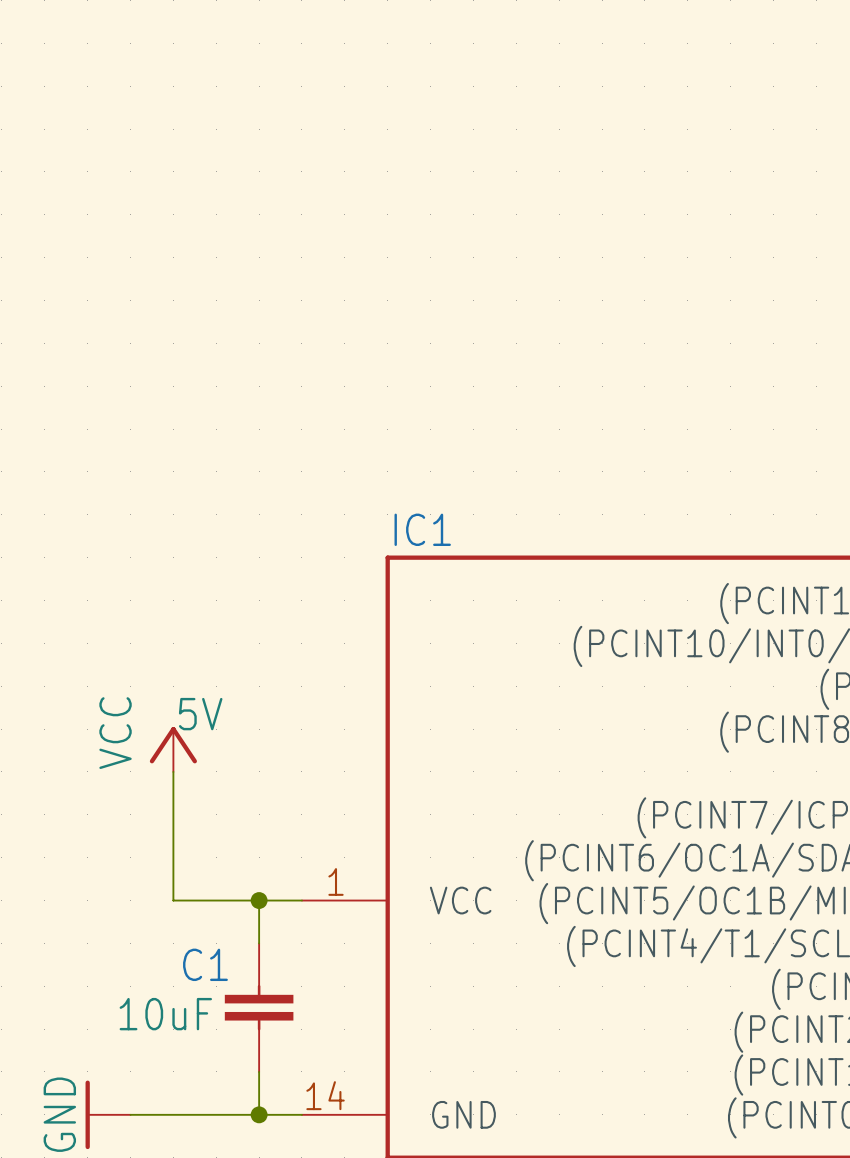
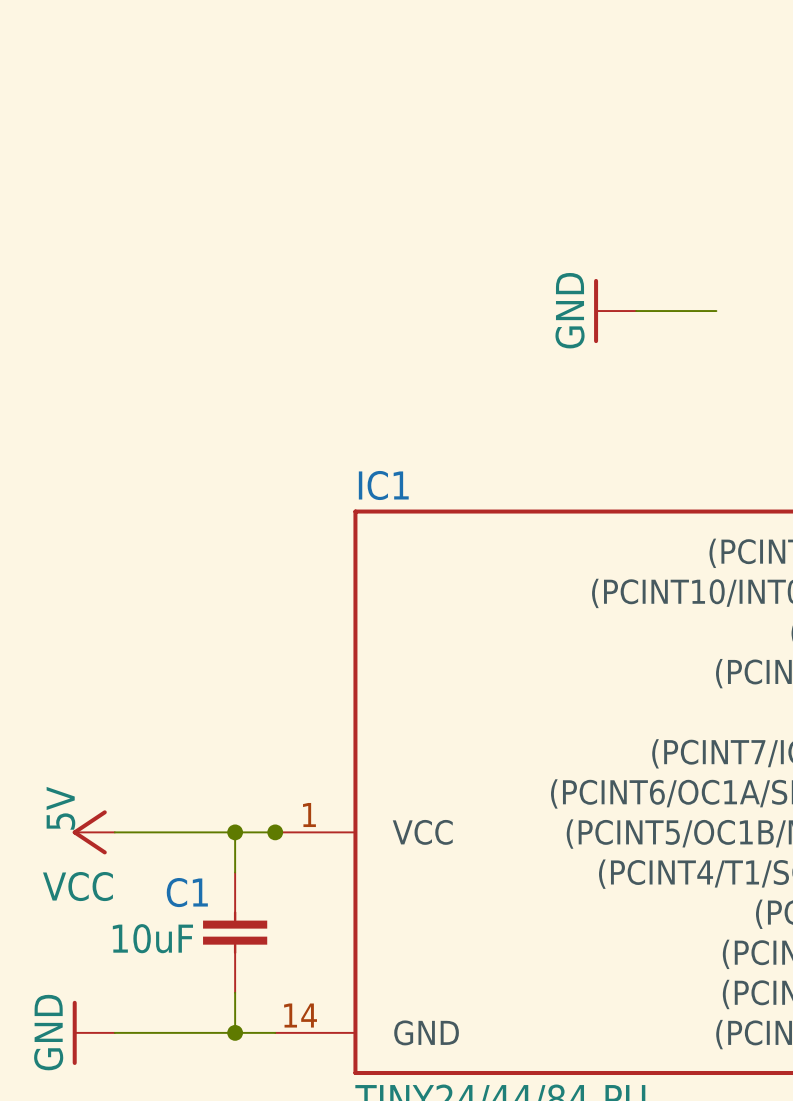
power symbol: none -> GND (615, 311)
wire: none -> (636, 311) (716, 311)
power symbol rotation: 0° (173, 745) -> 90° counterclockwise (89, 832)
power symbol position: VCC (173, 749) -> VCC (93, 832)
wire: (173, 771) (173, 900) -> (114, 832) (154, 832)
junction: none -> (275, 832)

